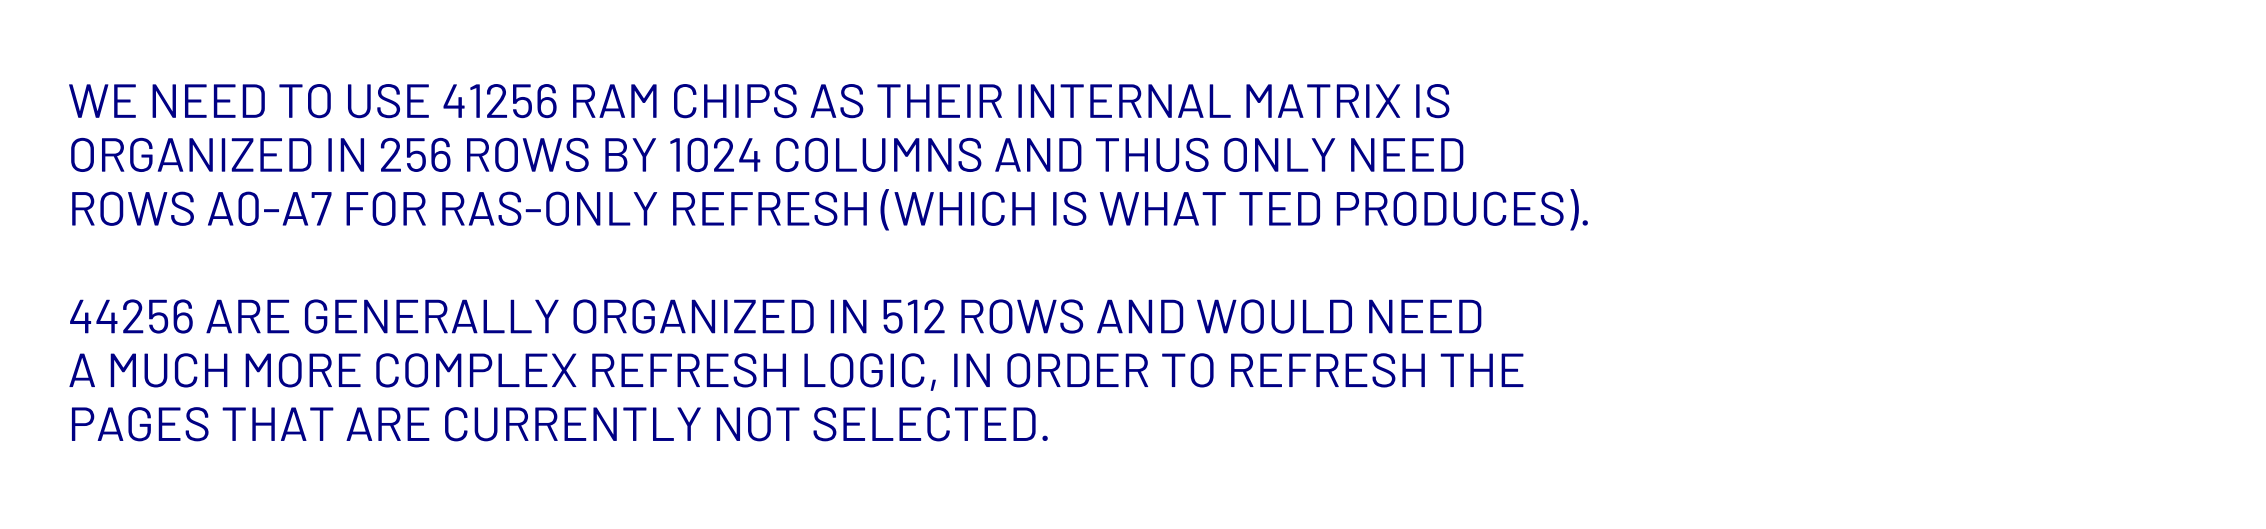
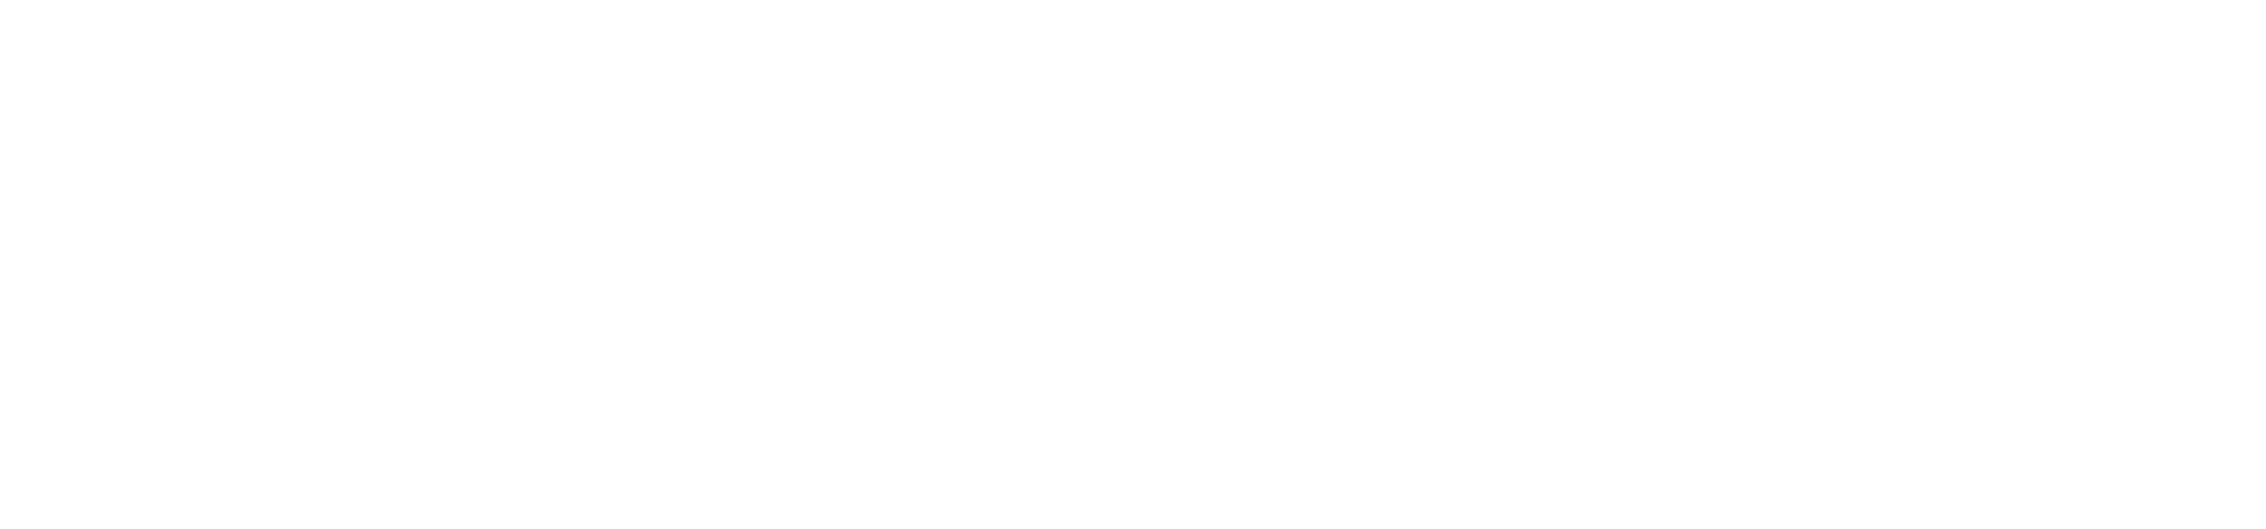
text: WE NEED TO USE 41256 RAM CHIPS AS THEIR INTERNAL MATRIX IS (759, 101) -> none
text: ORGANIZED IN 256 ROWS BY 1024 COLUMNS AND THUS ONLY NEED (767, 154) -> none
text: ROWS A0-A7 FOR RAS-ONLY REFRESH (WHICH IS WHAT TED PRODUCES). (830, 209) -> none
text: 44256 ARE GENERALLY ORGANIZED IN 512 ROWS AND WOULD NEED (775, 316) -> none
text: A MUCH MORE COMPLEX REFRESH LOGIC, IN ORDER TO REFRESH THE (796, 372) -> none
text: PAGES THAT ARE CURRENTLY NOT SELECTED. (559, 424) -> none

